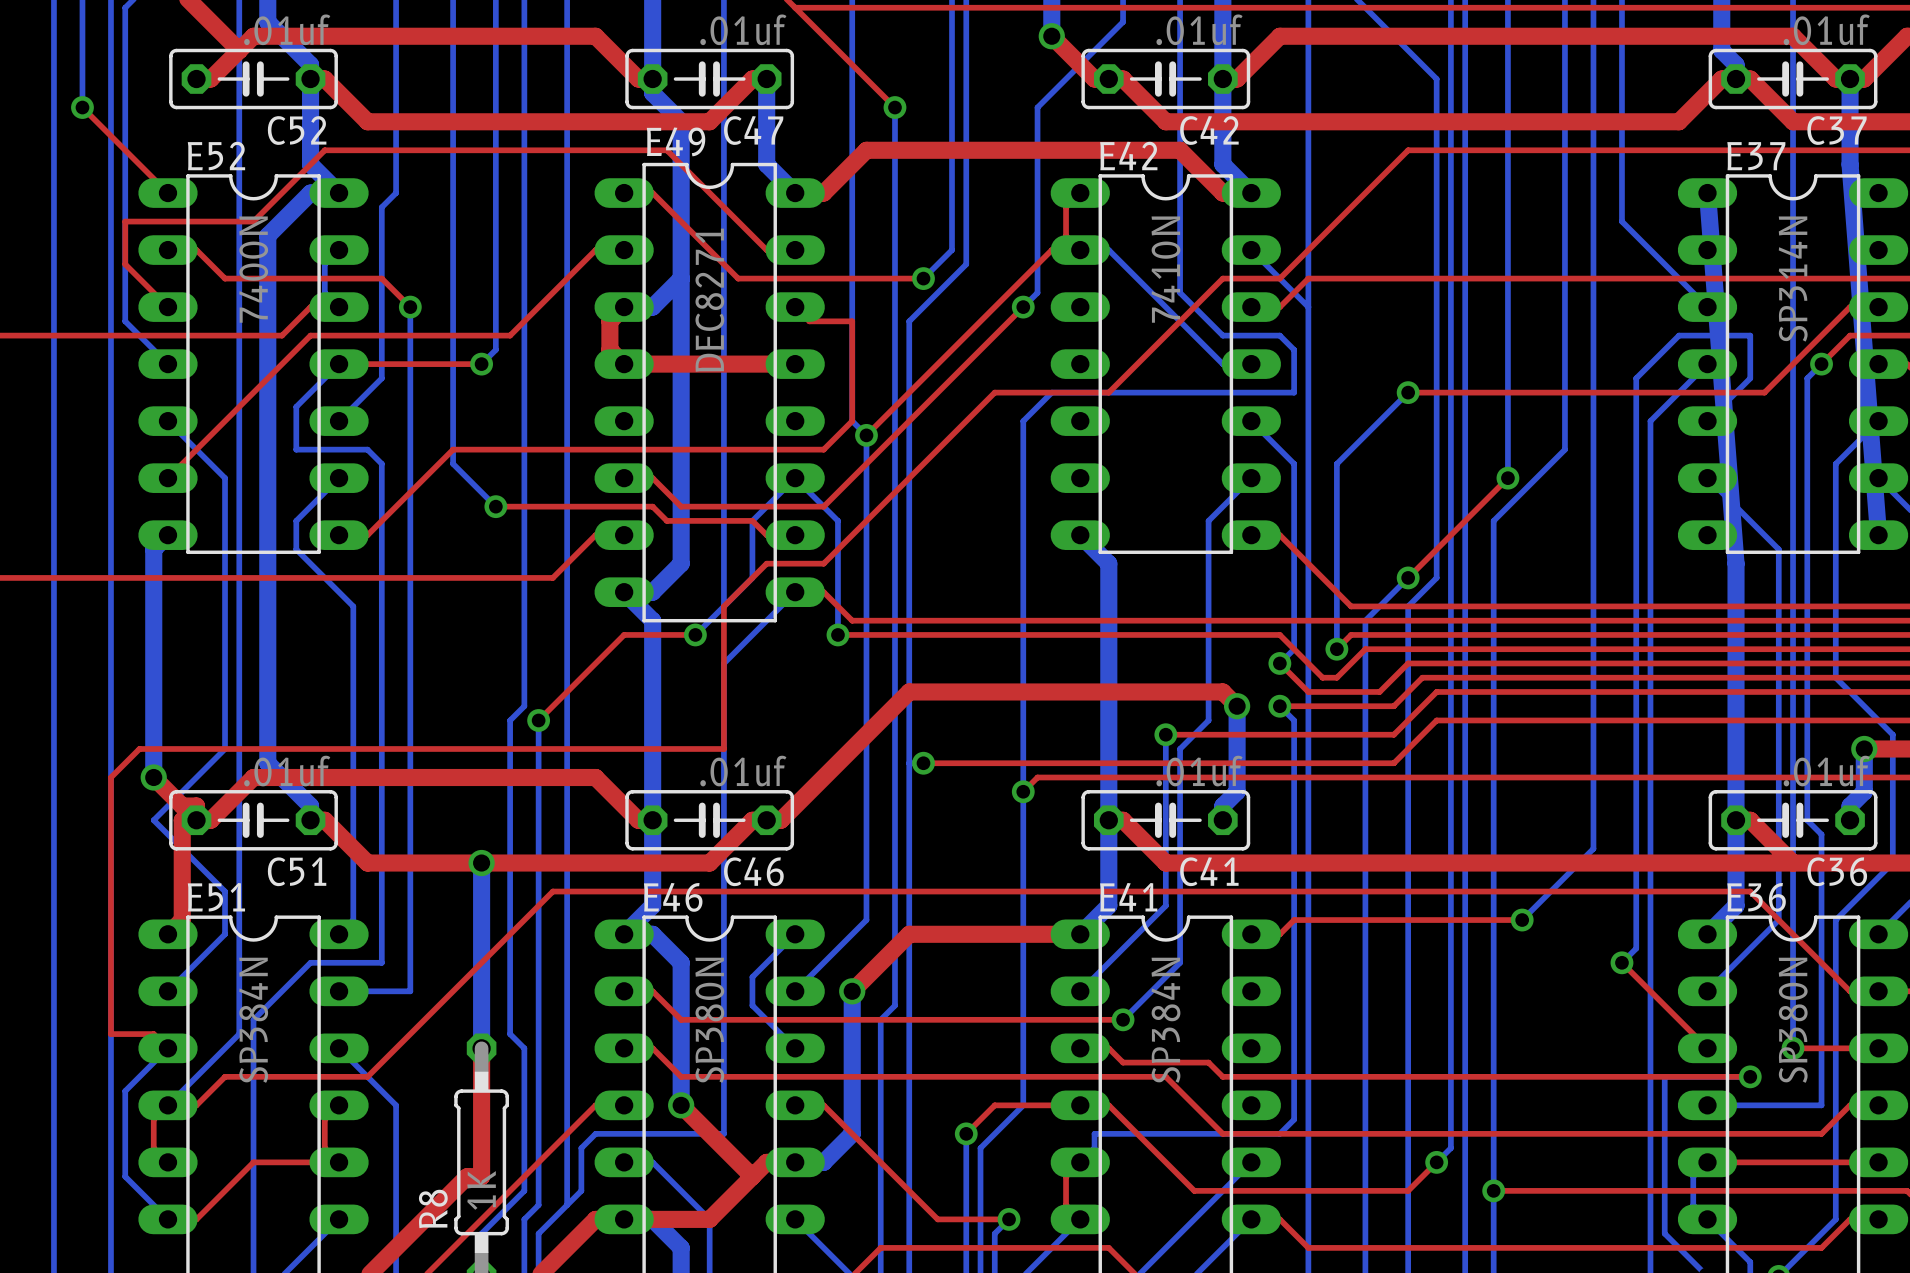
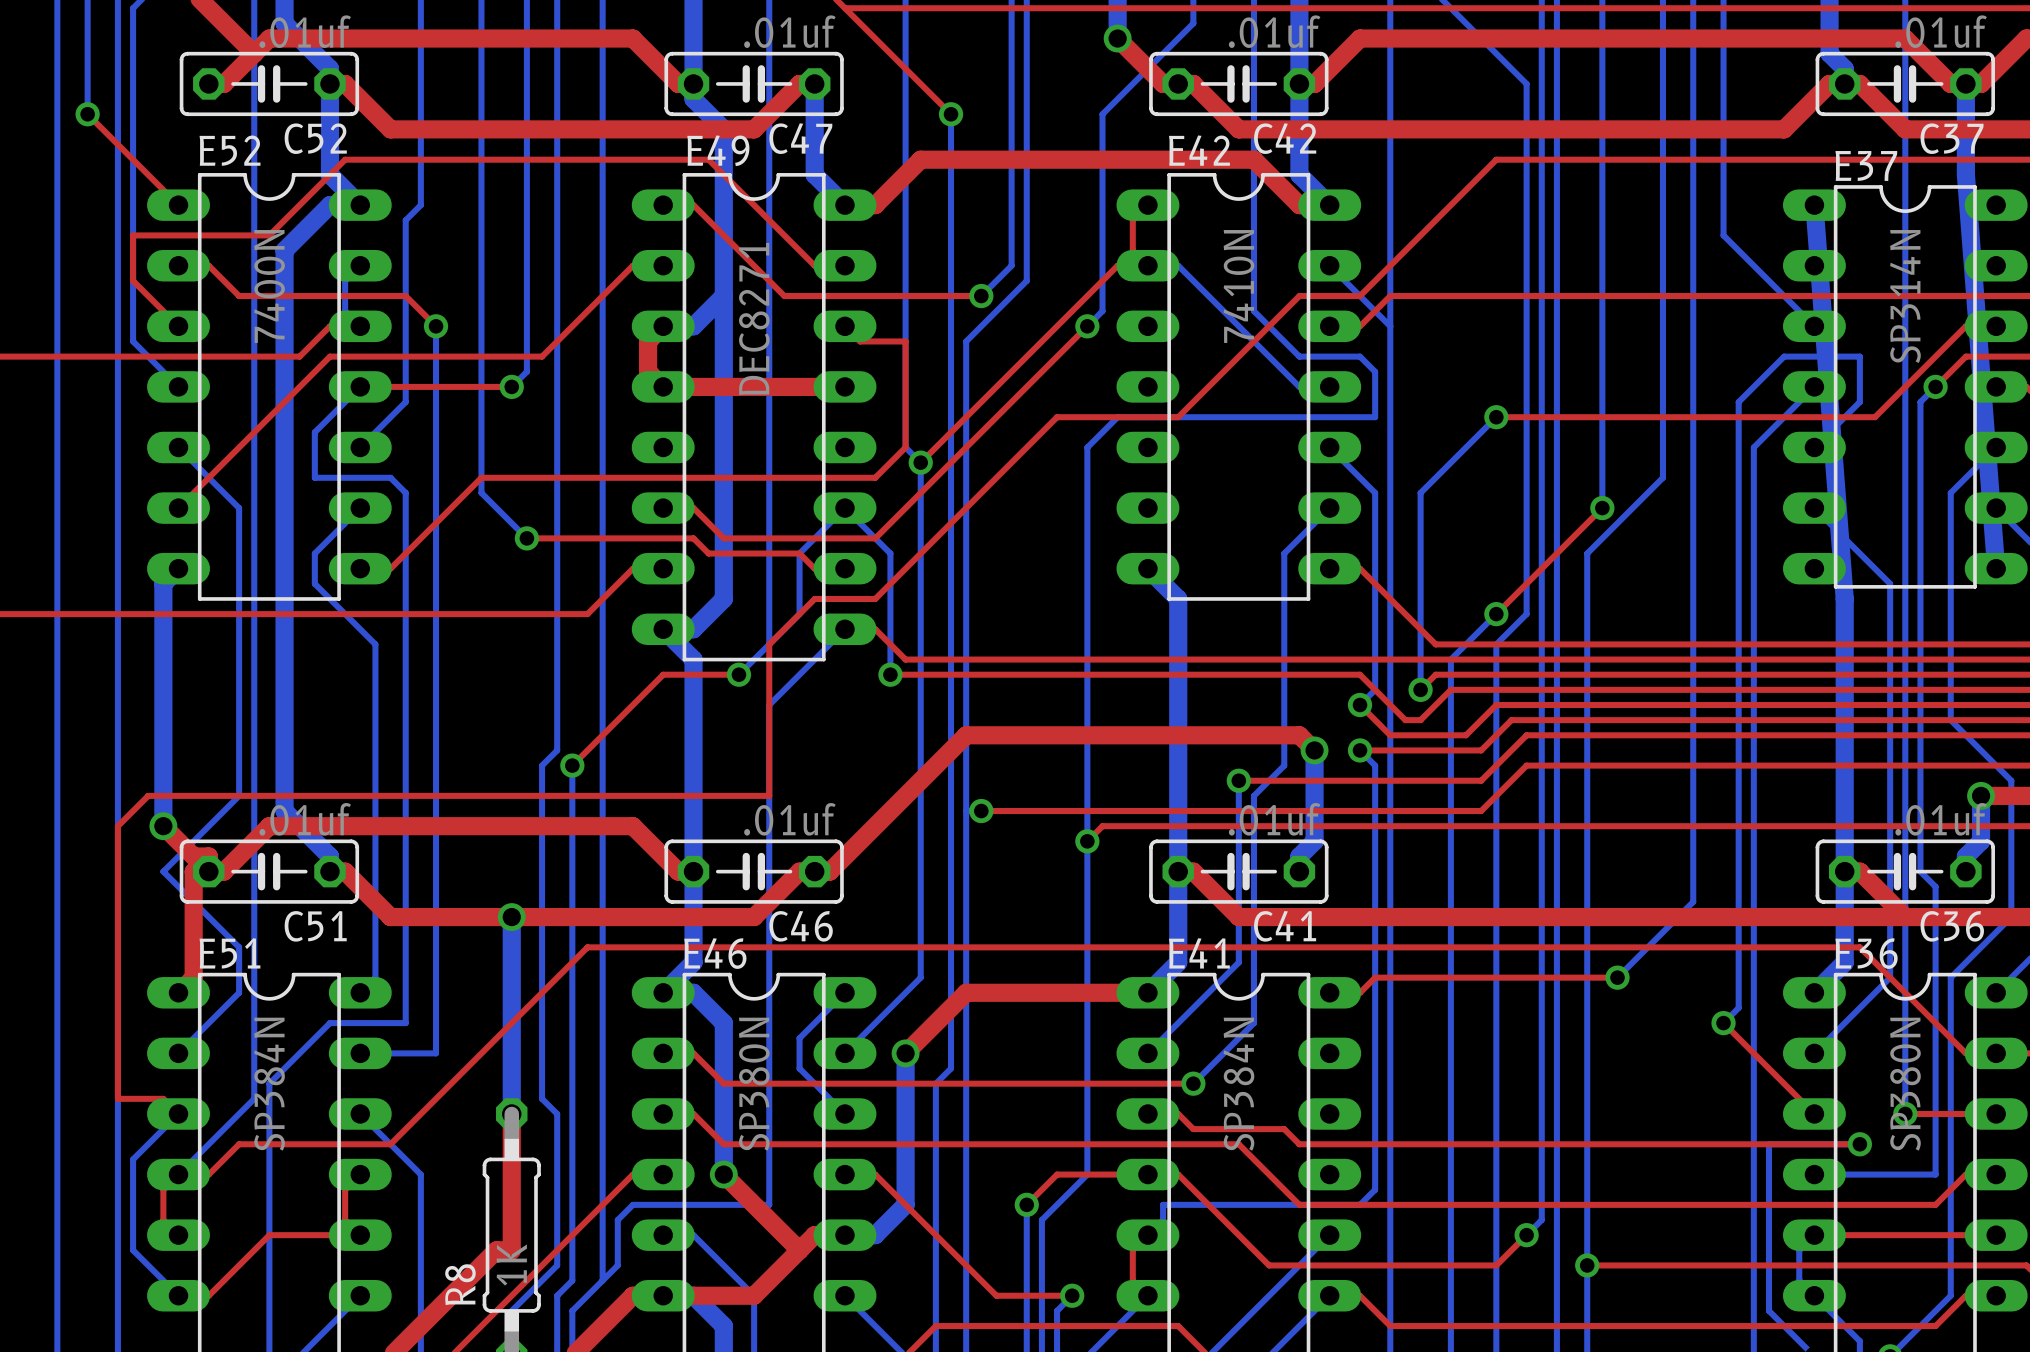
E42 name position: E42 (1128, 155) -> E42 (1199, 150)
E52 name position: E52 (216, 156) -> E52 (230, 150)
E52 footprint: [138, 174, 369, 554] -> [147, 173, 392, 601]
E42 footprint: [1050, 174, 1282, 554] -> [1116, 173, 1362, 601]

